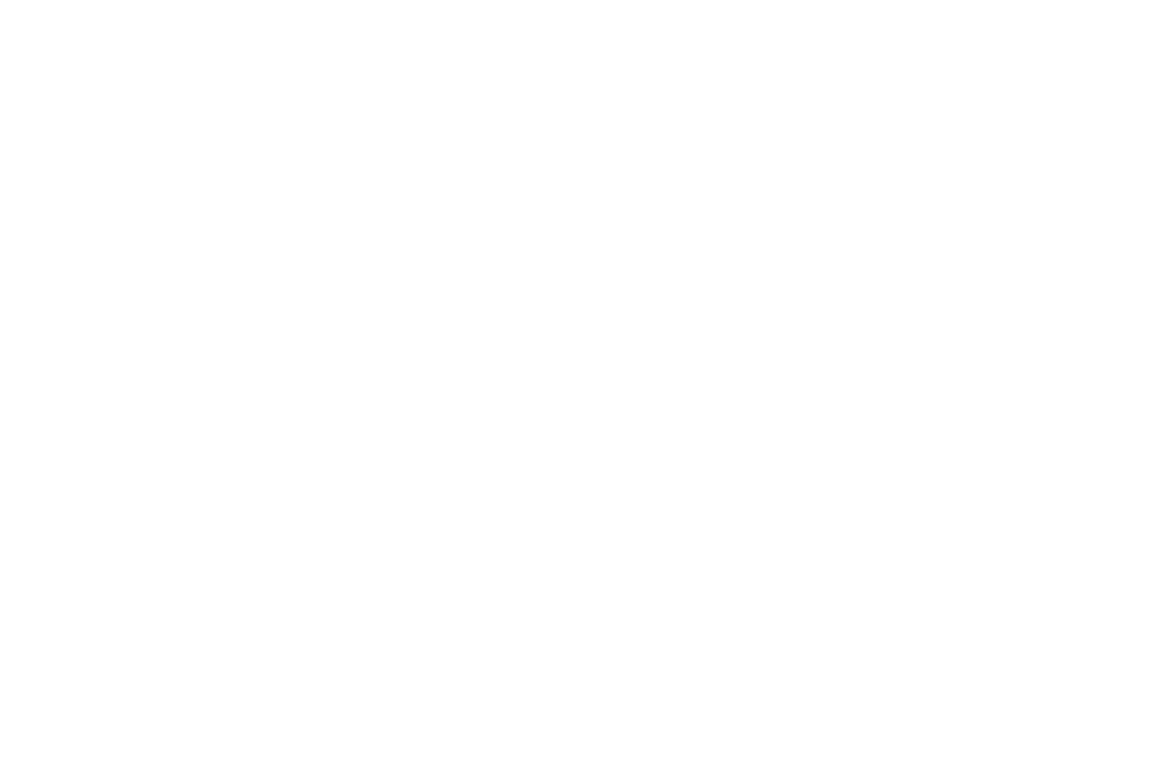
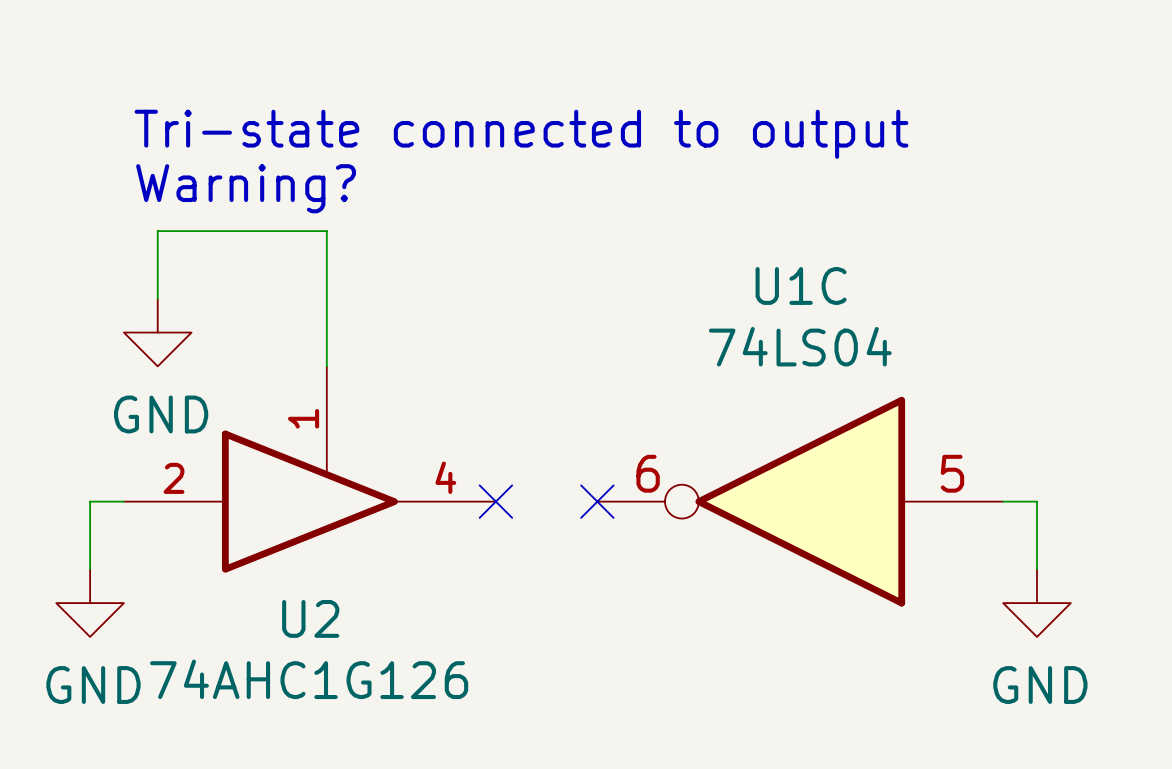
text: none -> Tri-state connected to output (521, 134)
text: none -> Warning? (246, 188)
wire: none -> (157, 298) (157, 231) (326, 231) (326, 366)
power symbol: none -> GND (157, 332)
U2: none -> 74AHC1G126 (309, 469)
wire: none -> (123, 501) (90, 501) (90, 569)
no-connect mark: none -> (495, 501)
no-connect mark: none -> (597, 501)
U1C: none -> 74LS04 (800, 501)
wire: none -> (1003, 501) (1037, 501) (1037, 569)
power symbol: none -> GND (90, 603)
power symbol: none -> GND (1037, 603)

